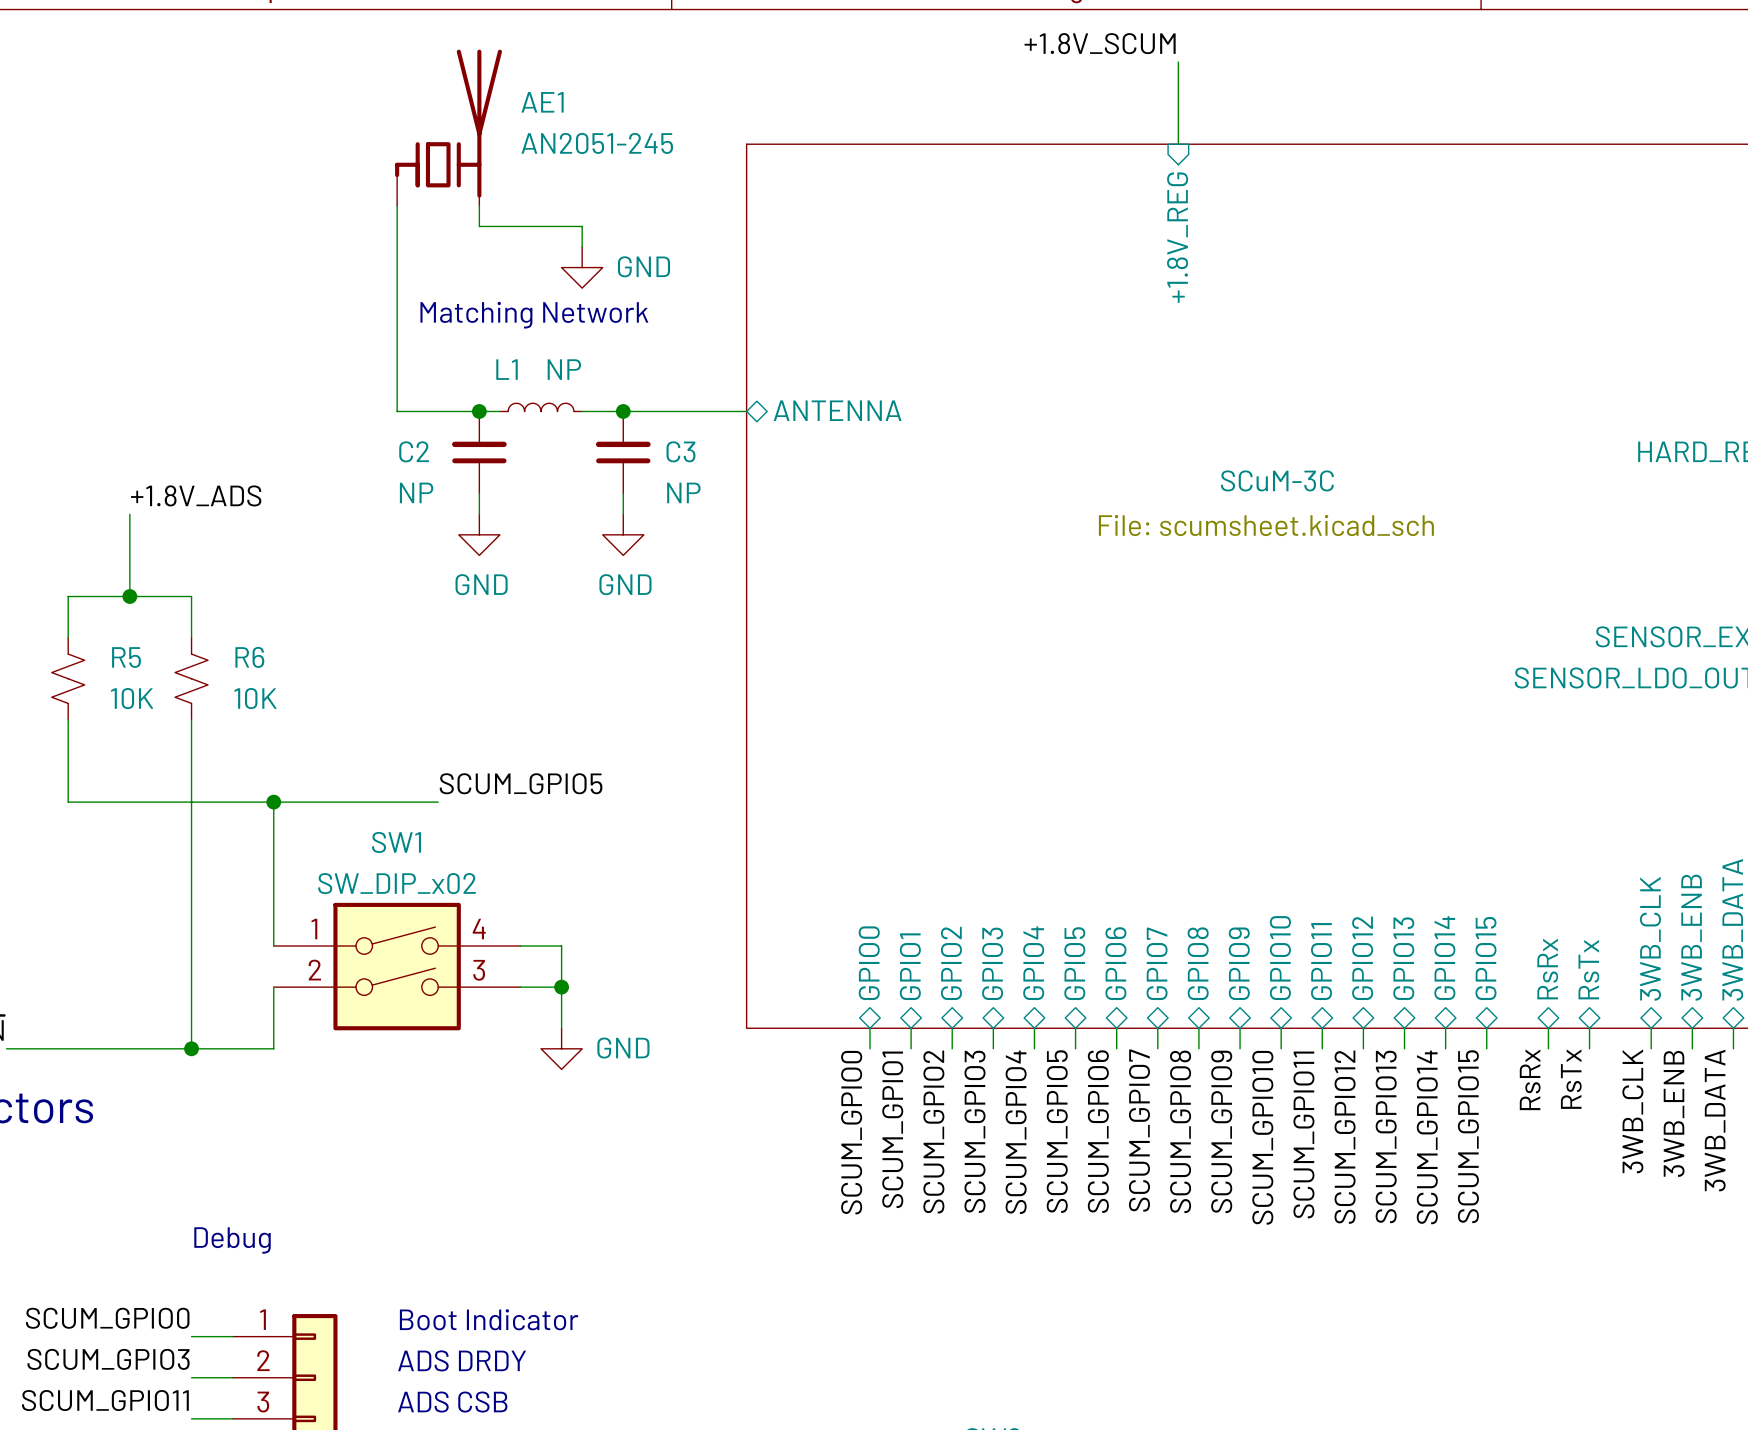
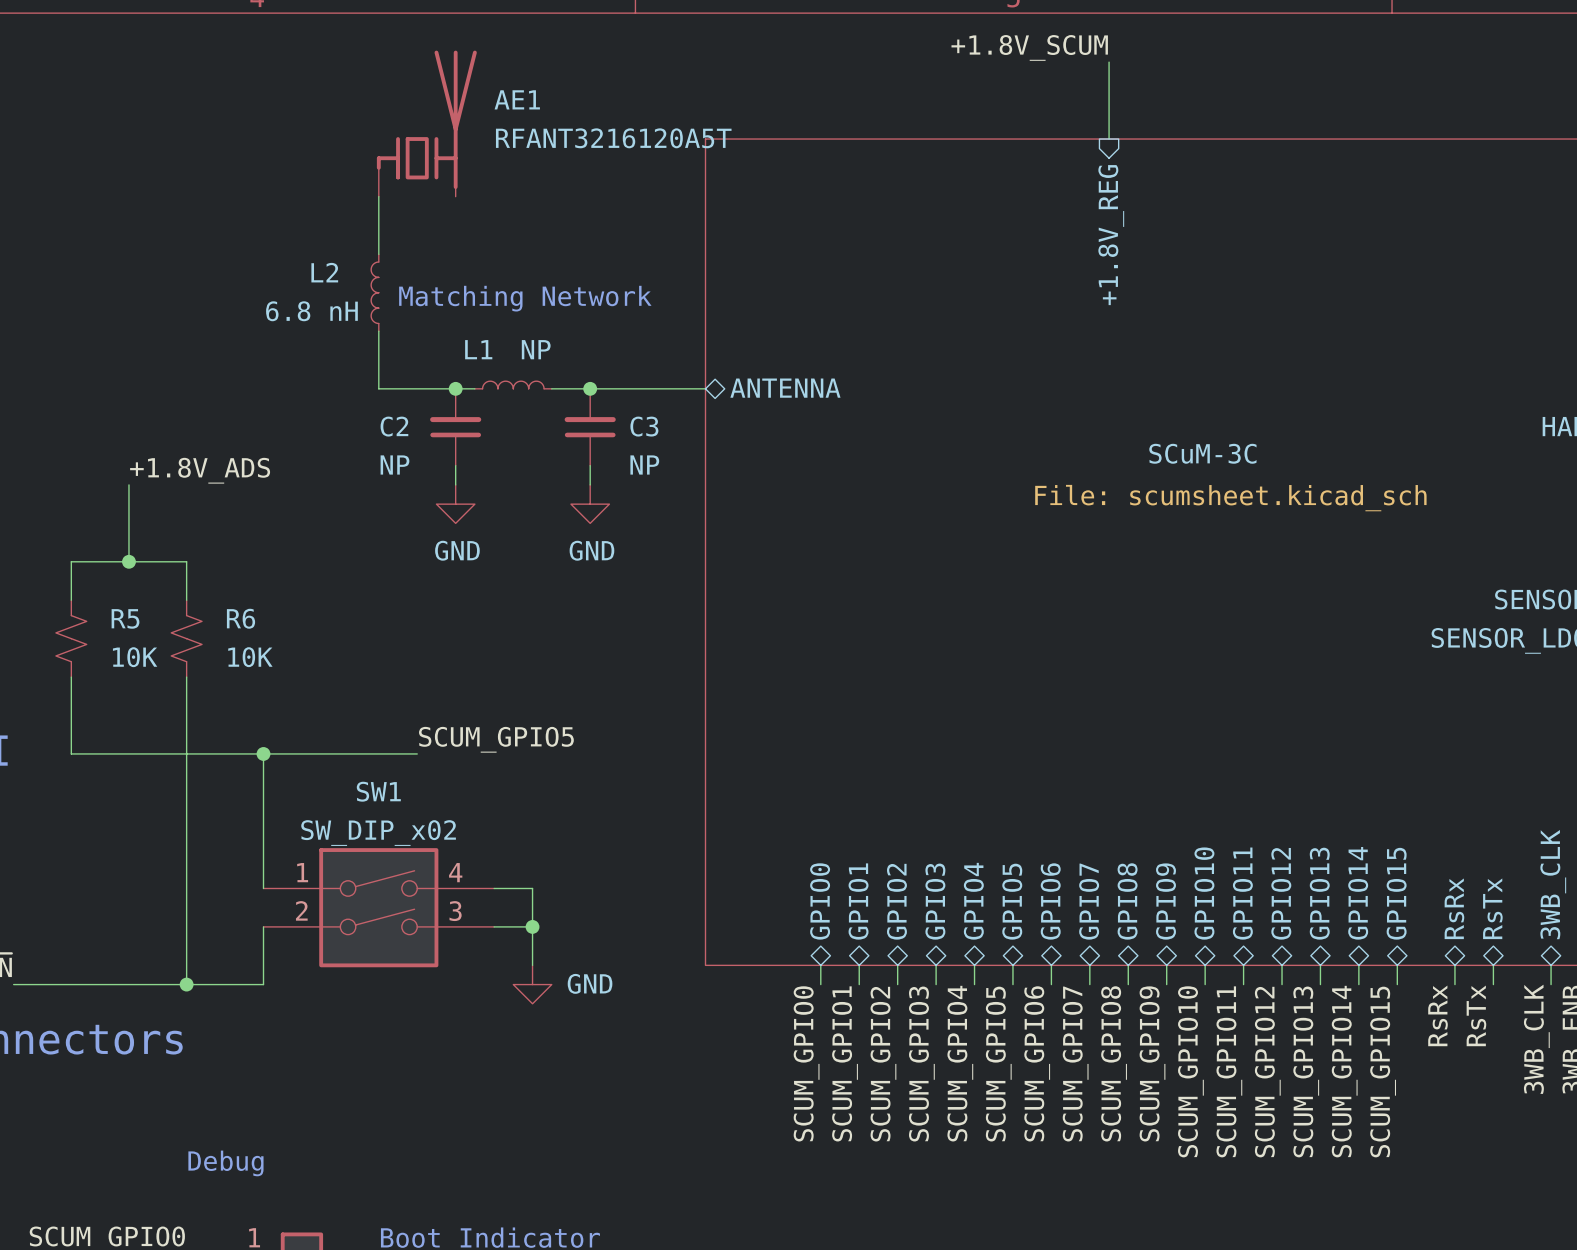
AE1 value: AN2051-245 (597, 143) -> RFANT3216120A5T (613, 138)
wire: (479, 205) (479, 226) (582, 226) (582, 247) -> none
wire: (397, 267) (397, 349) -> none
power symbol: GND (582, 267) -> none
L2: none -> 6.8 nH (374, 292)

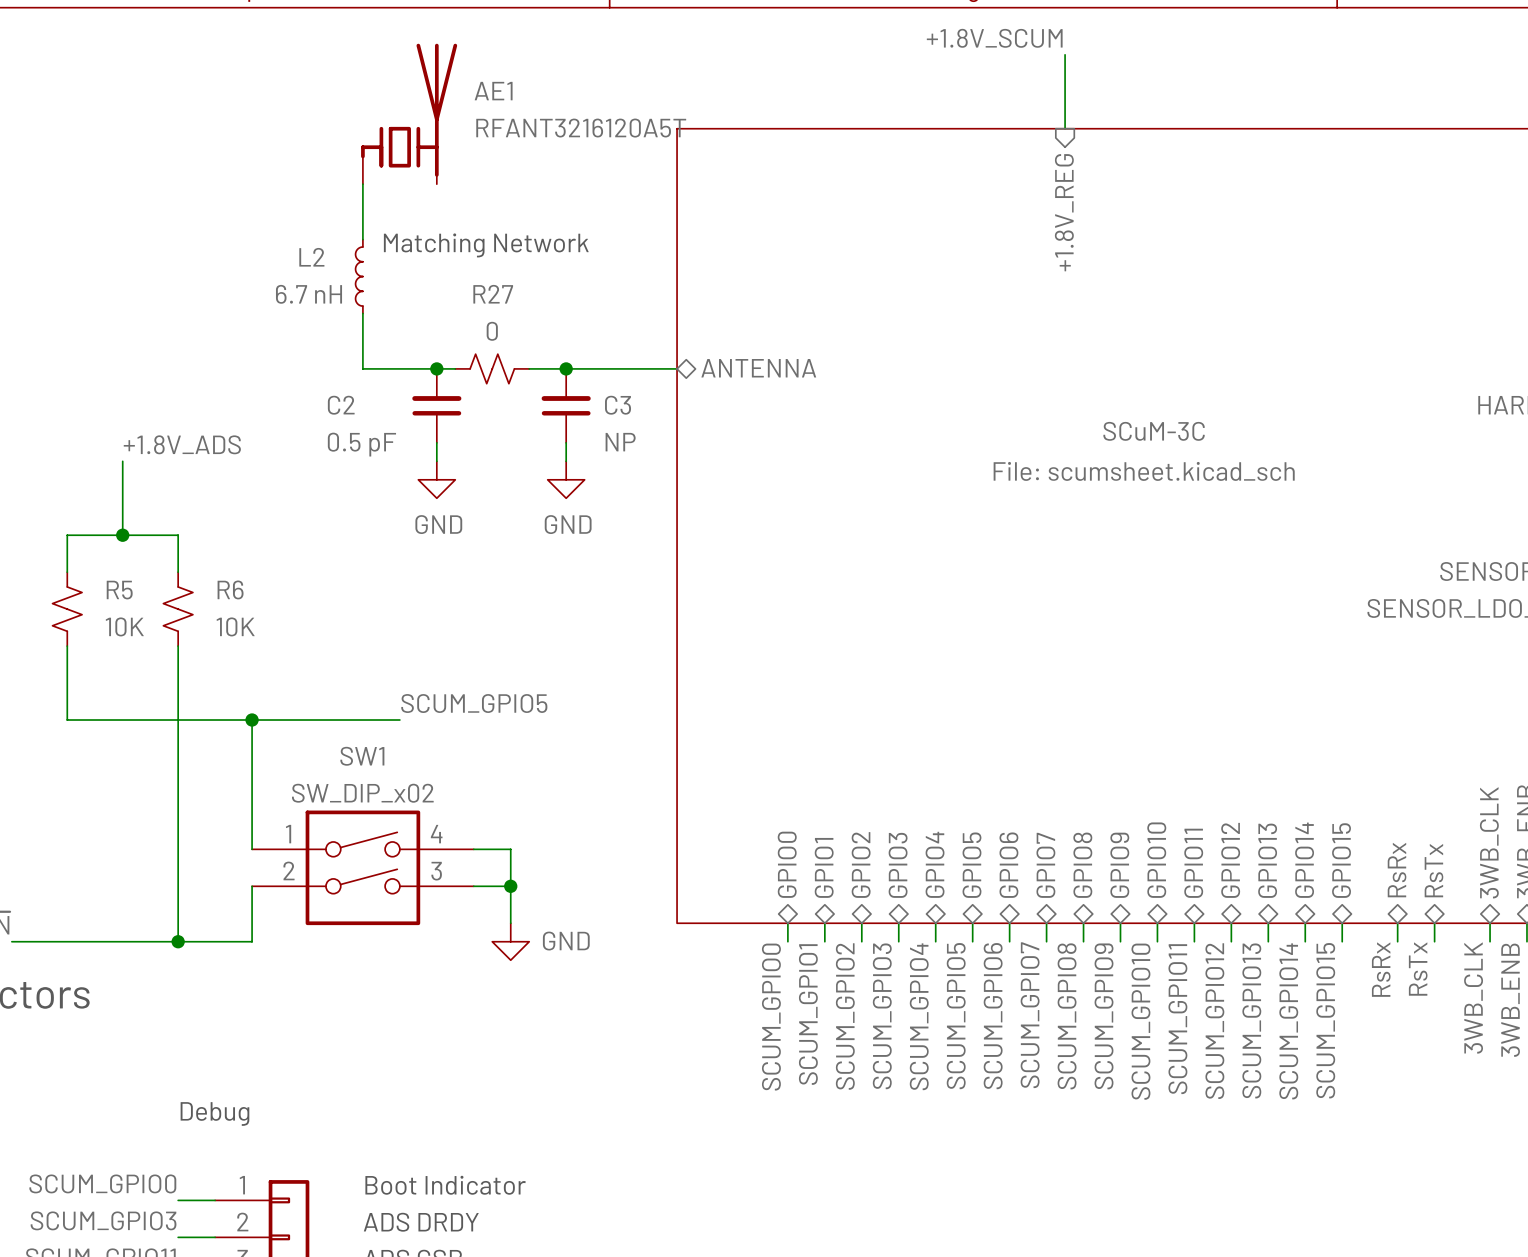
text position: Matching Network (525, 298) -> Matching Network (486, 245)
L2 value: 6.8 nH (311, 311) -> 6.7 nH (309, 294)
L1: NP (513, 385) -> none
R27: none -> 0 (492, 368)
C2 name position: C2 (394, 426) -> C2 (341, 405)
C2 value: NP (394, 464) -> 0.5 pF (361, 444)

